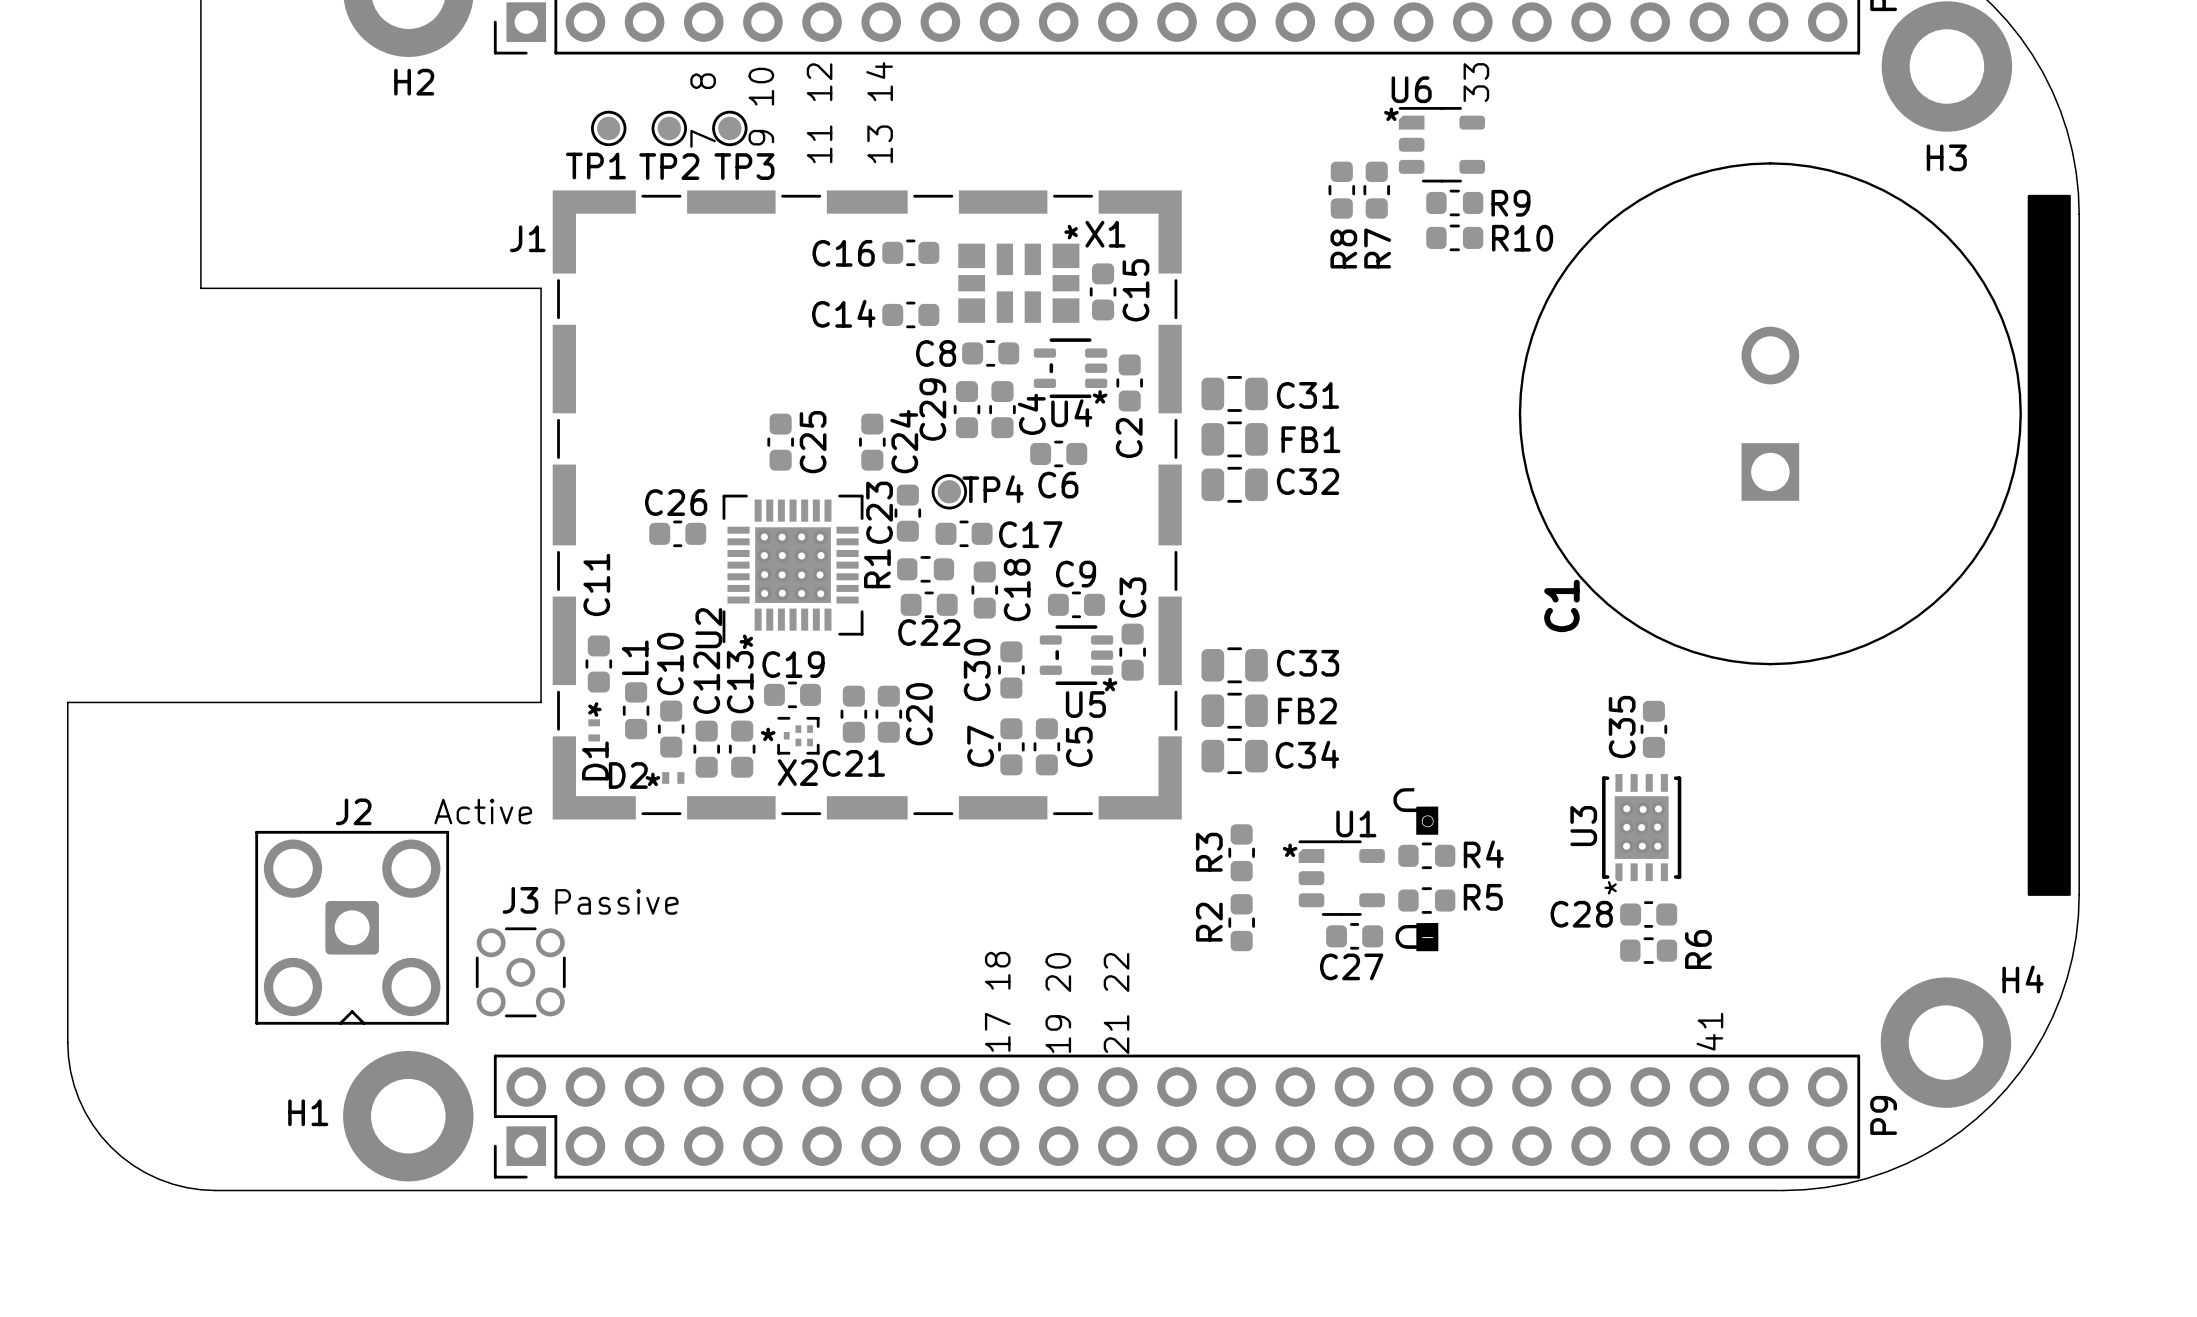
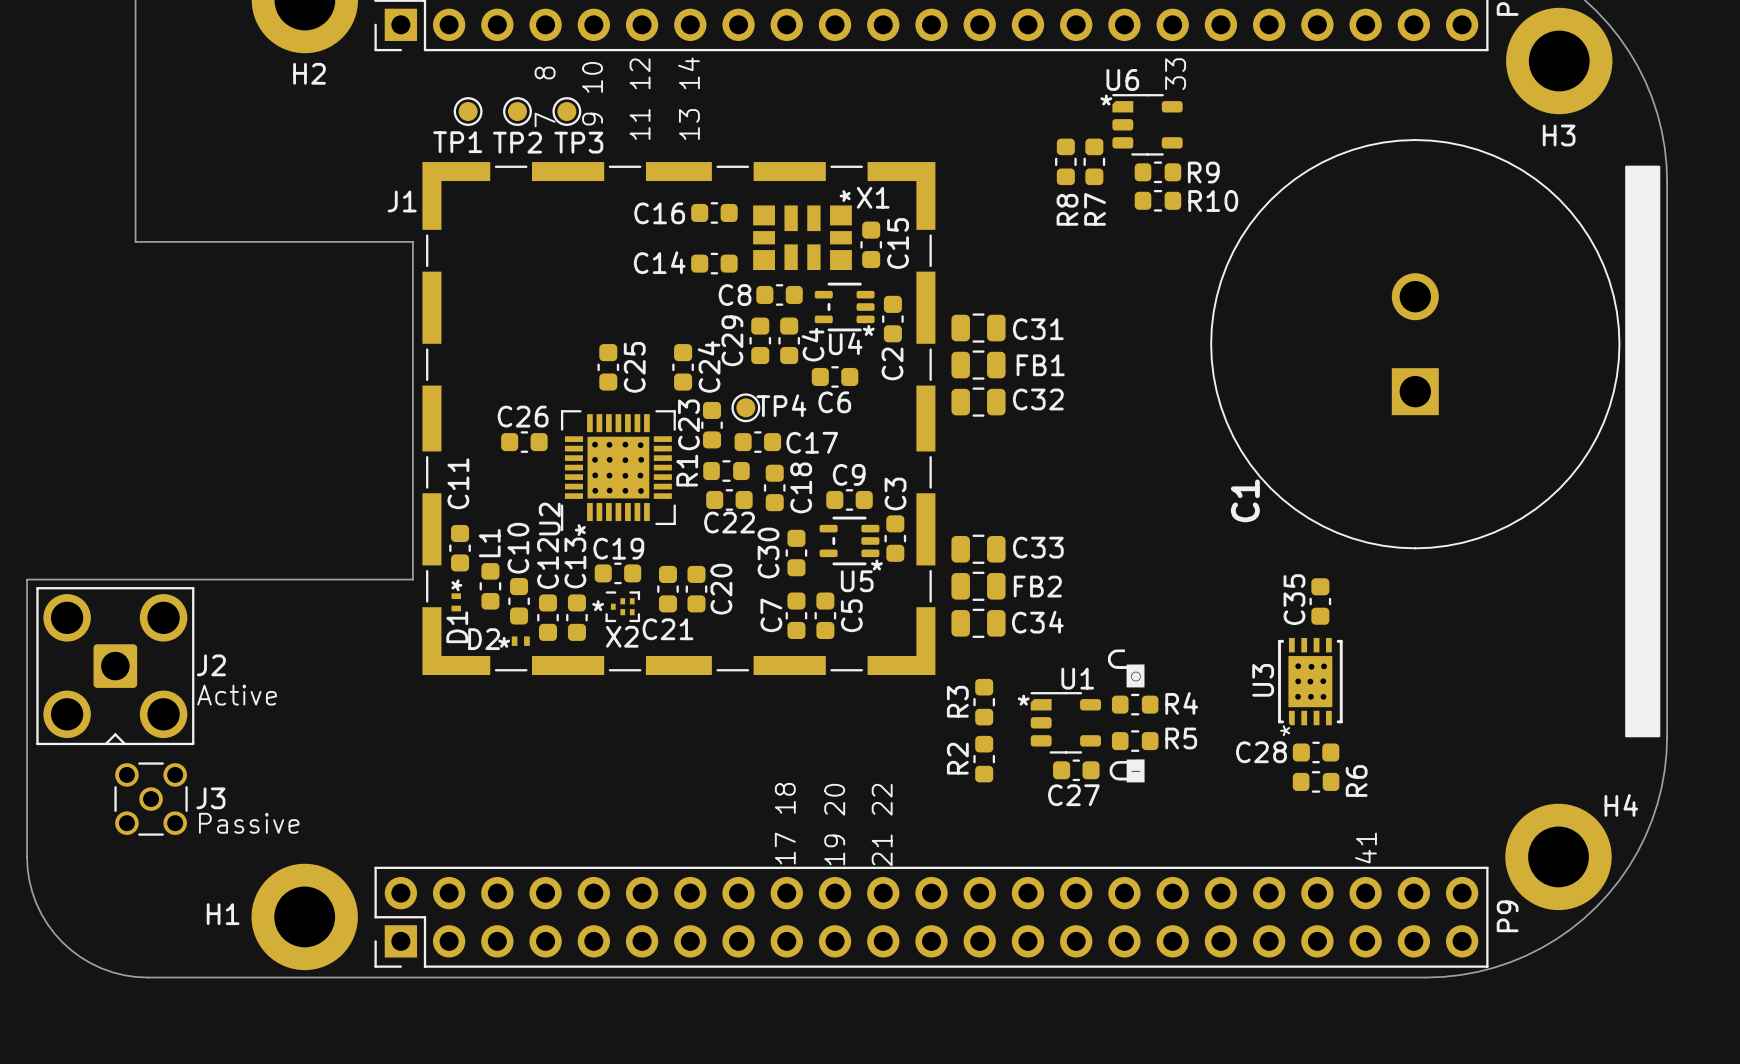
J2 name position: J2 (353, 811) -> J2 (211, 665)
text position: Active (483, 811) -> Active (237, 695)
J3 name position: J3 (520, 900) -> J3 (210, 798)
text position: Passive (616, 901) -> Passive (249, 823)
J2 position: (352, 927) -> (115, 666)
J3 position: (520, 972) -> (151, 799)

